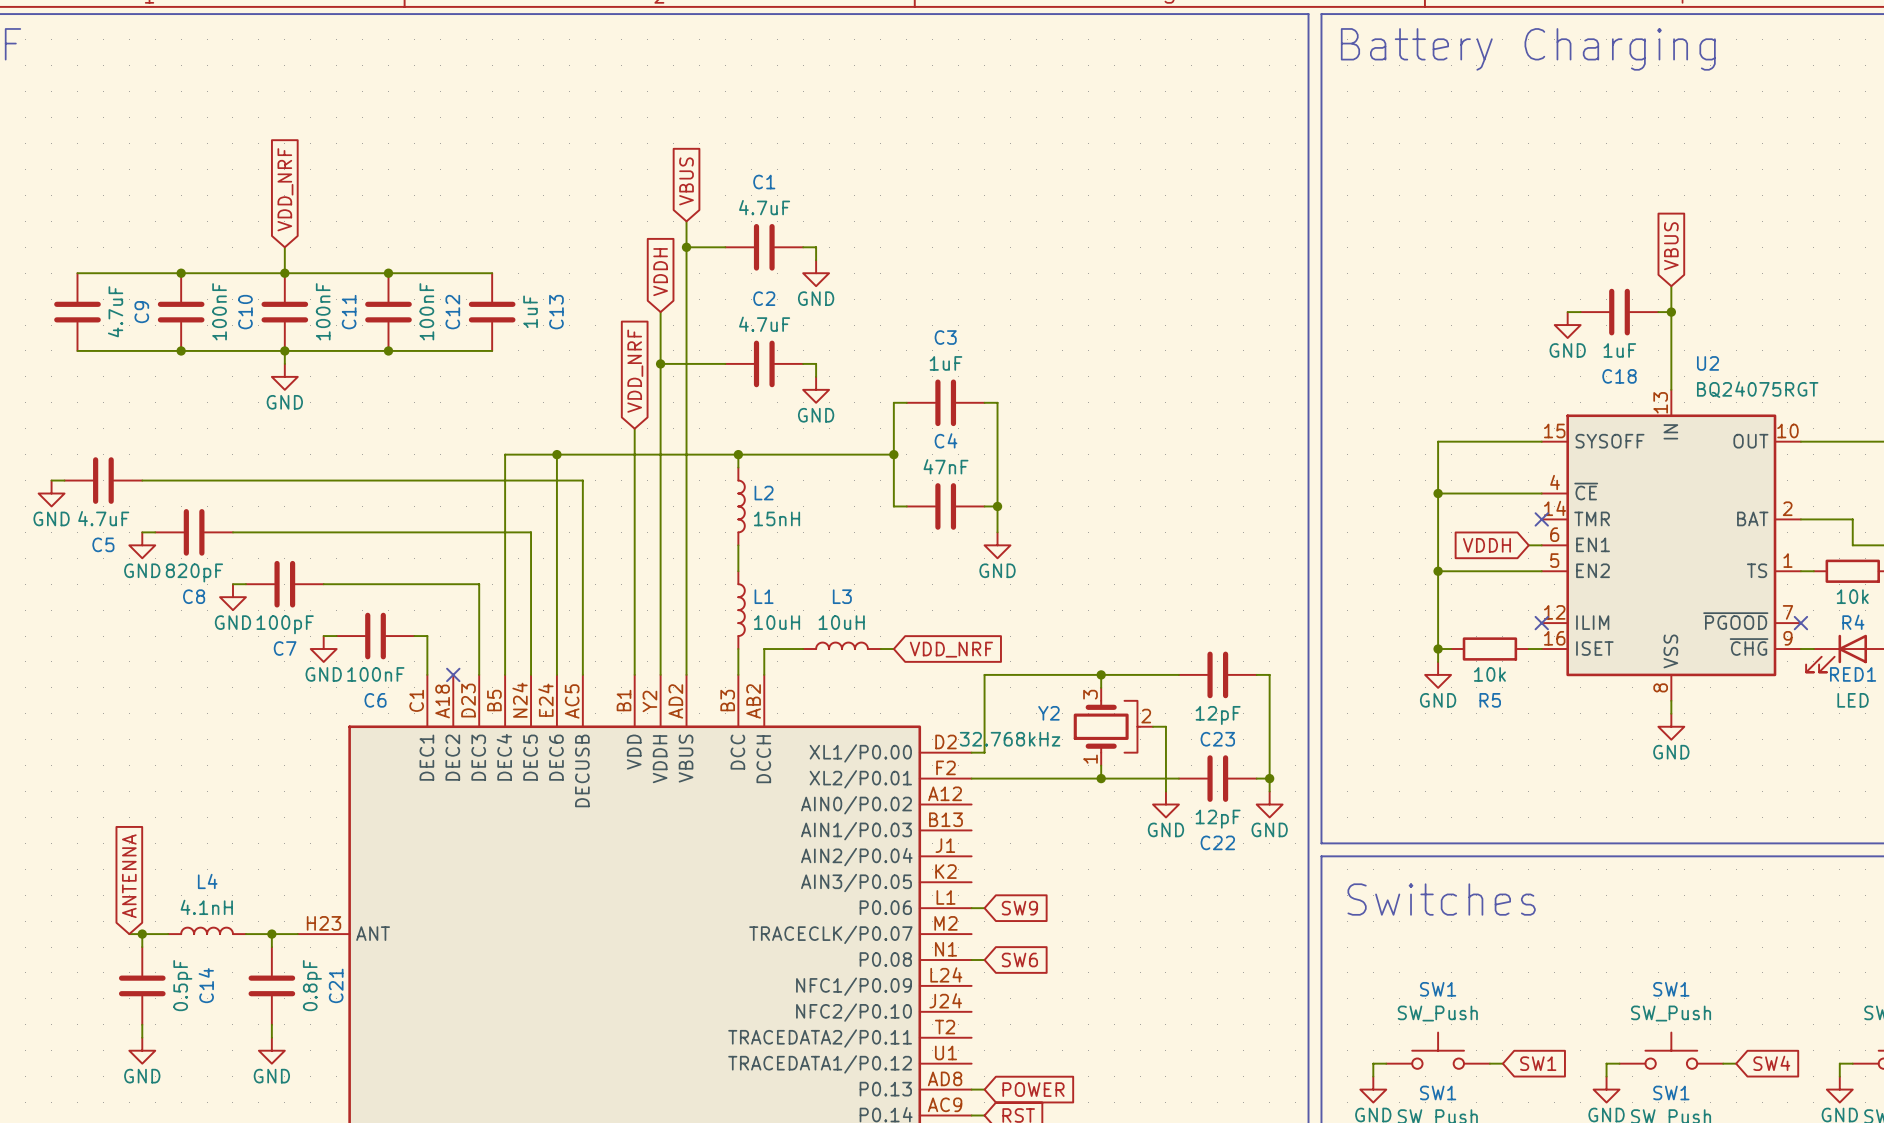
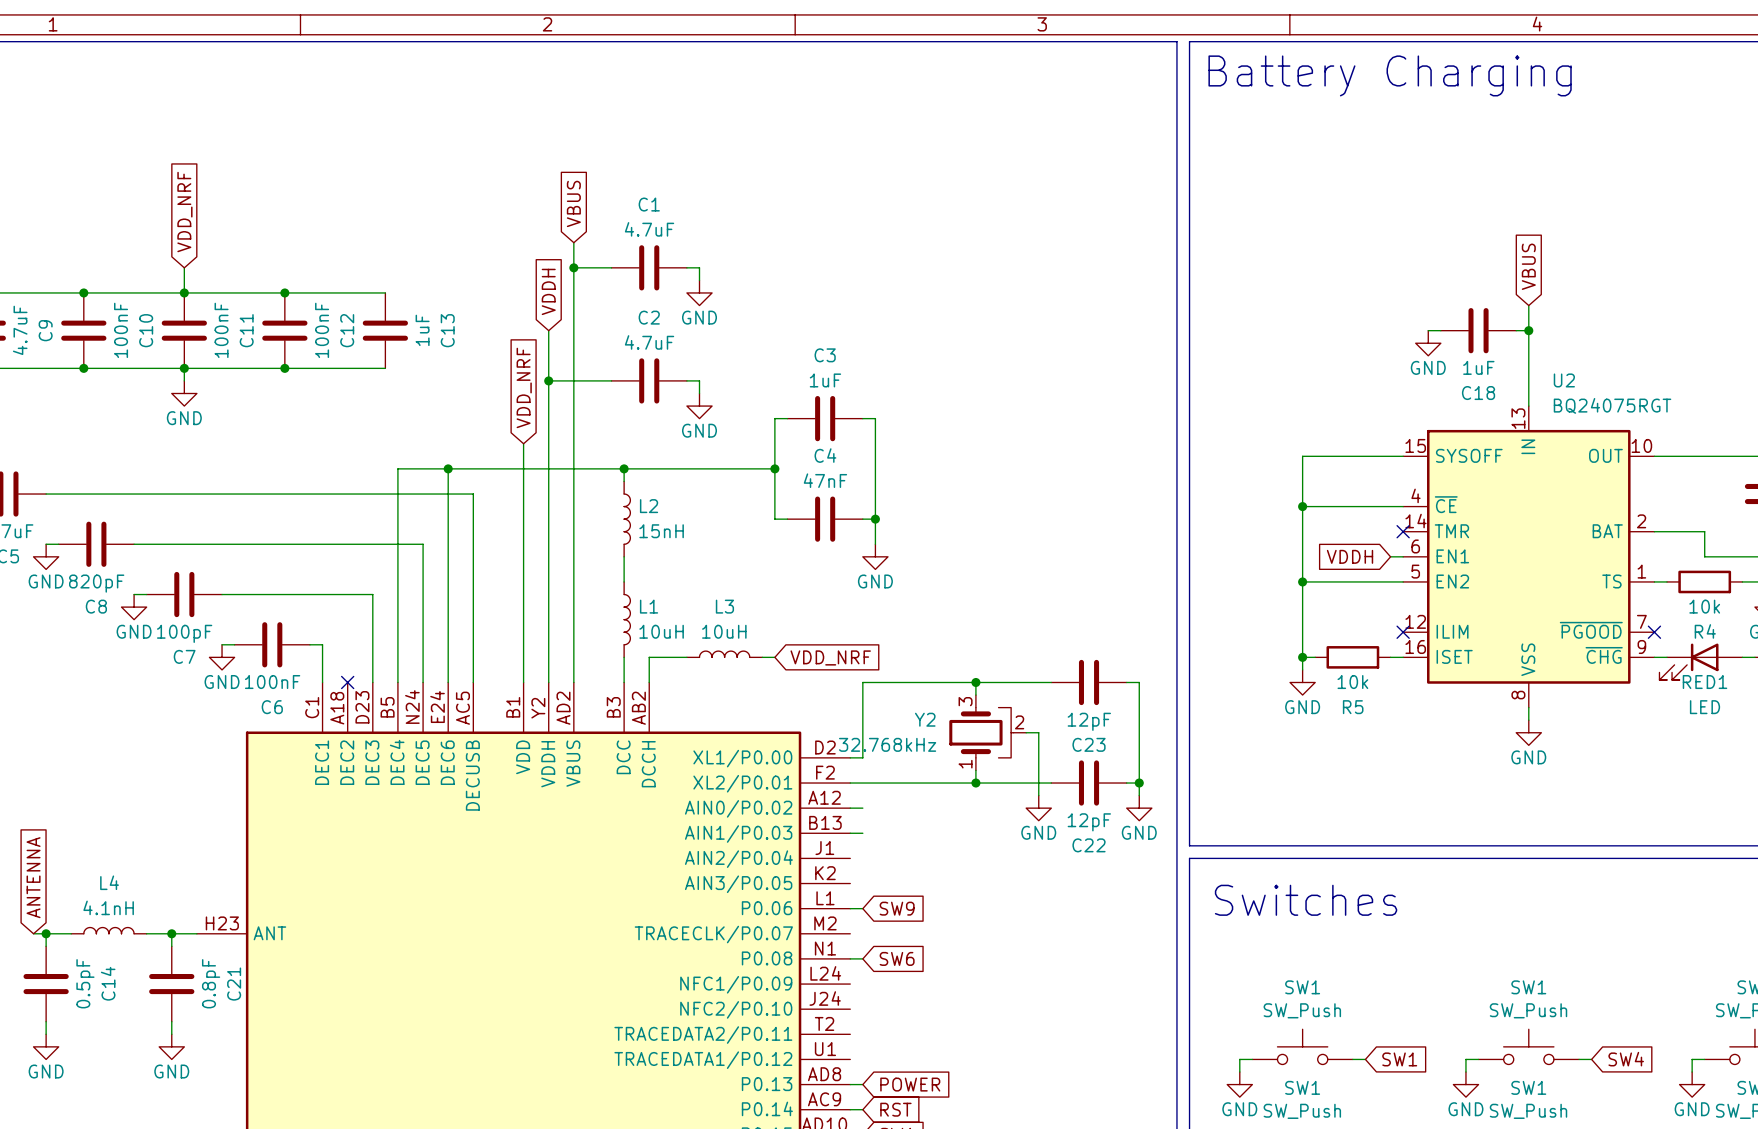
wire: none -> (850, 808) (862, 808)
wire: none -> (850, 833) (862, 833)

